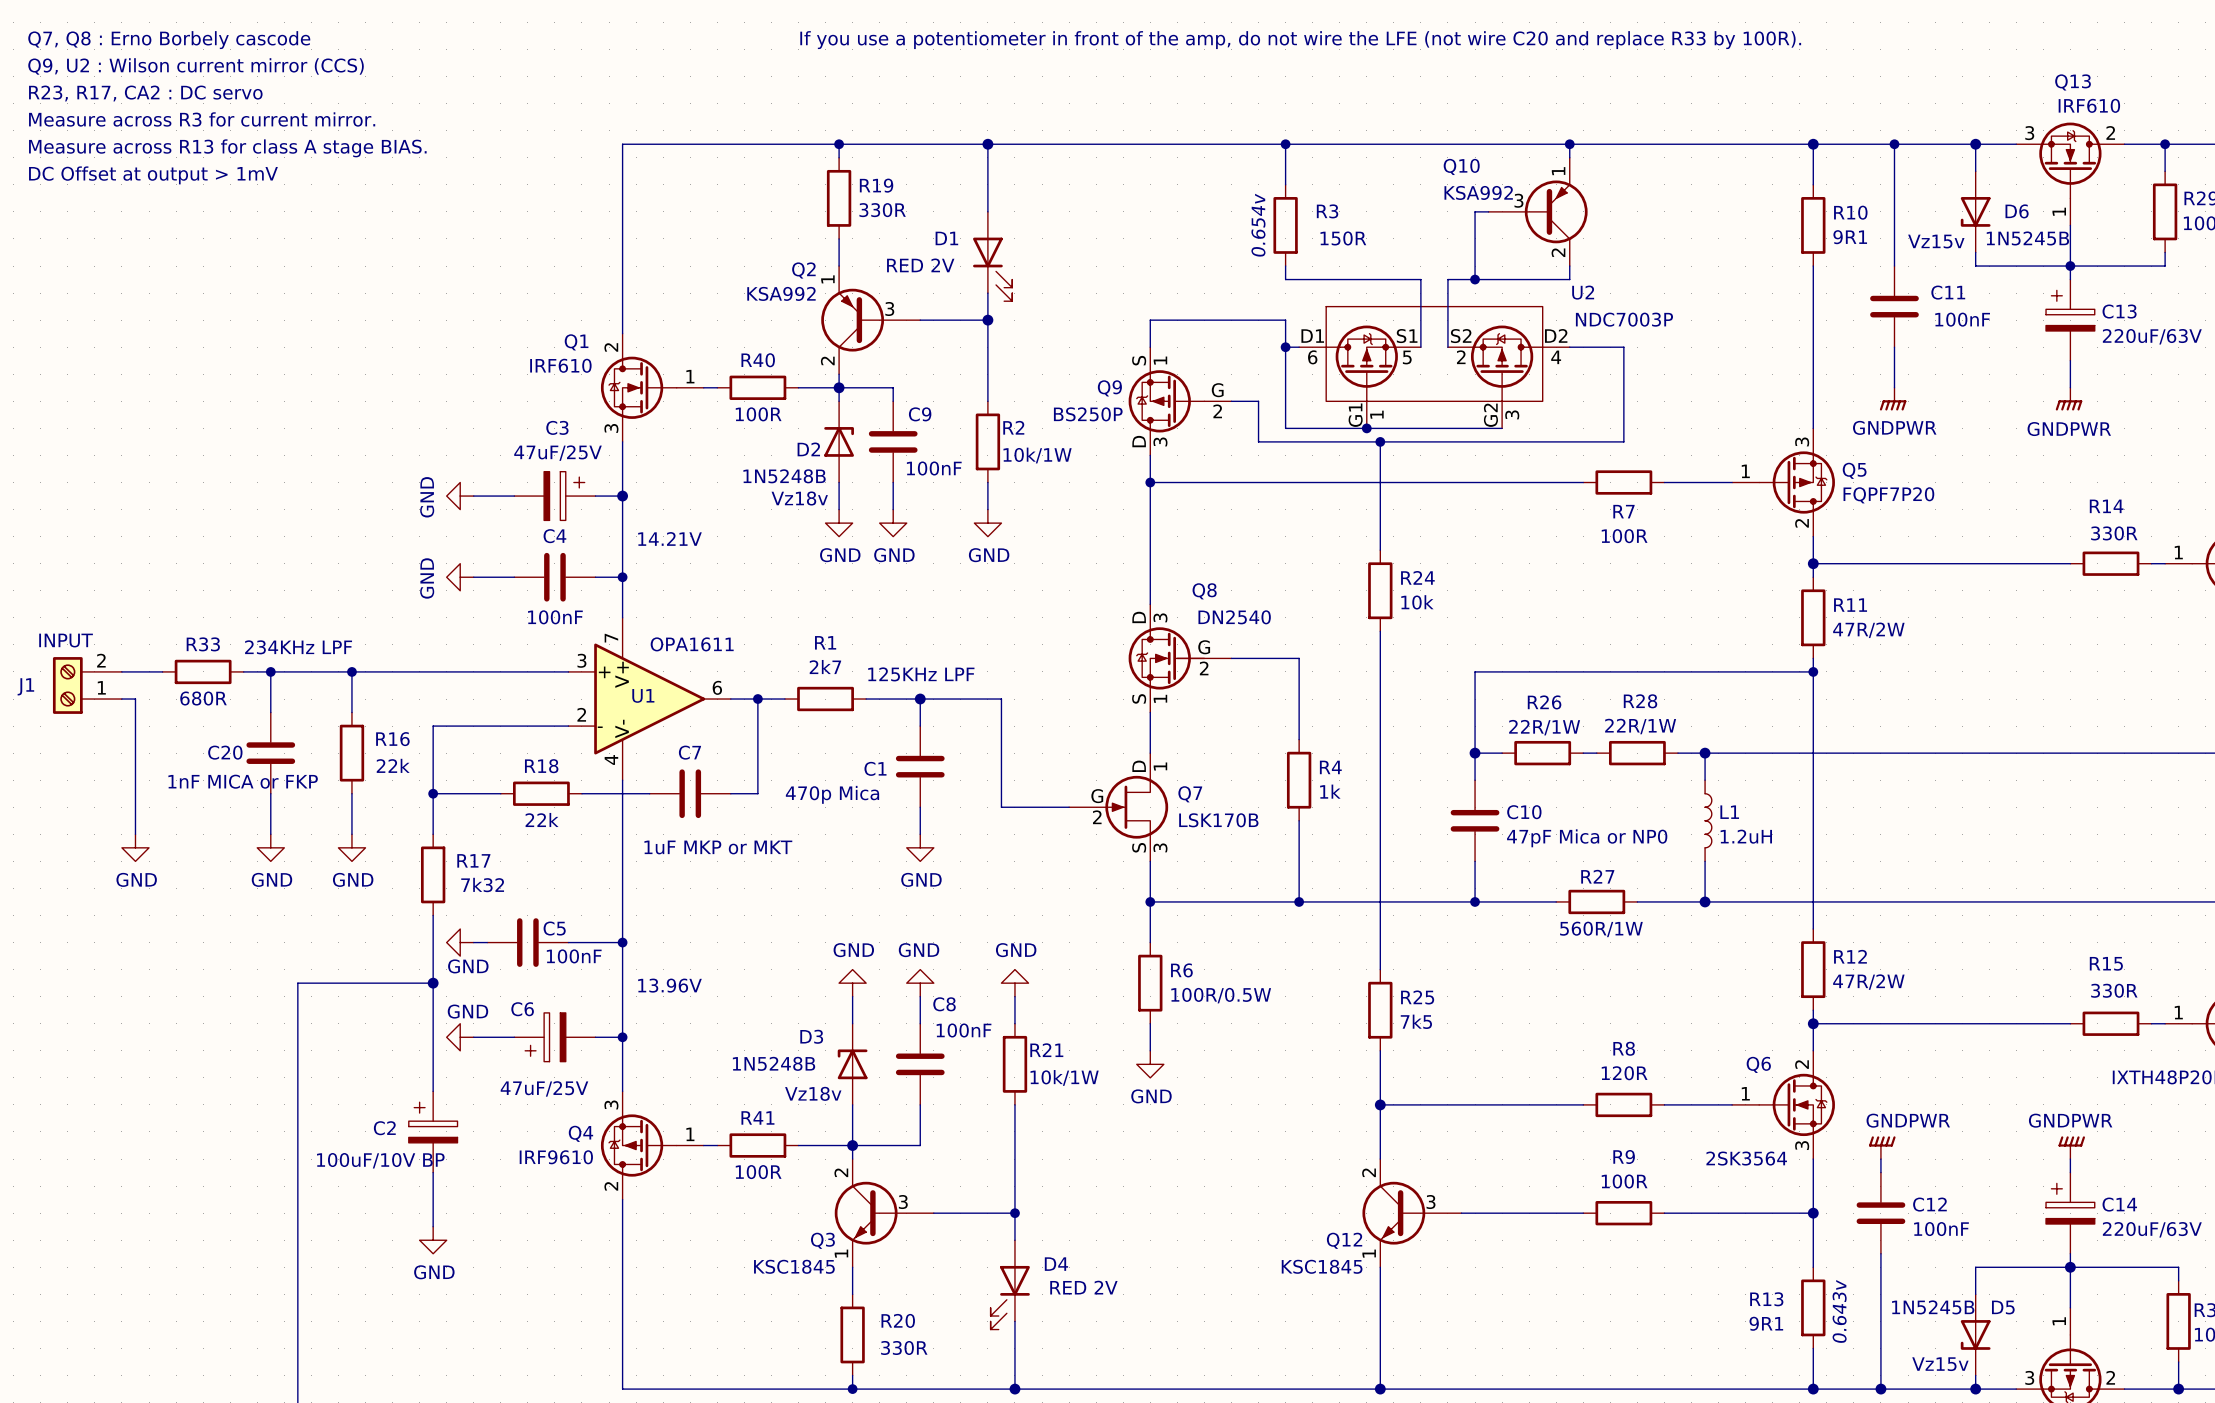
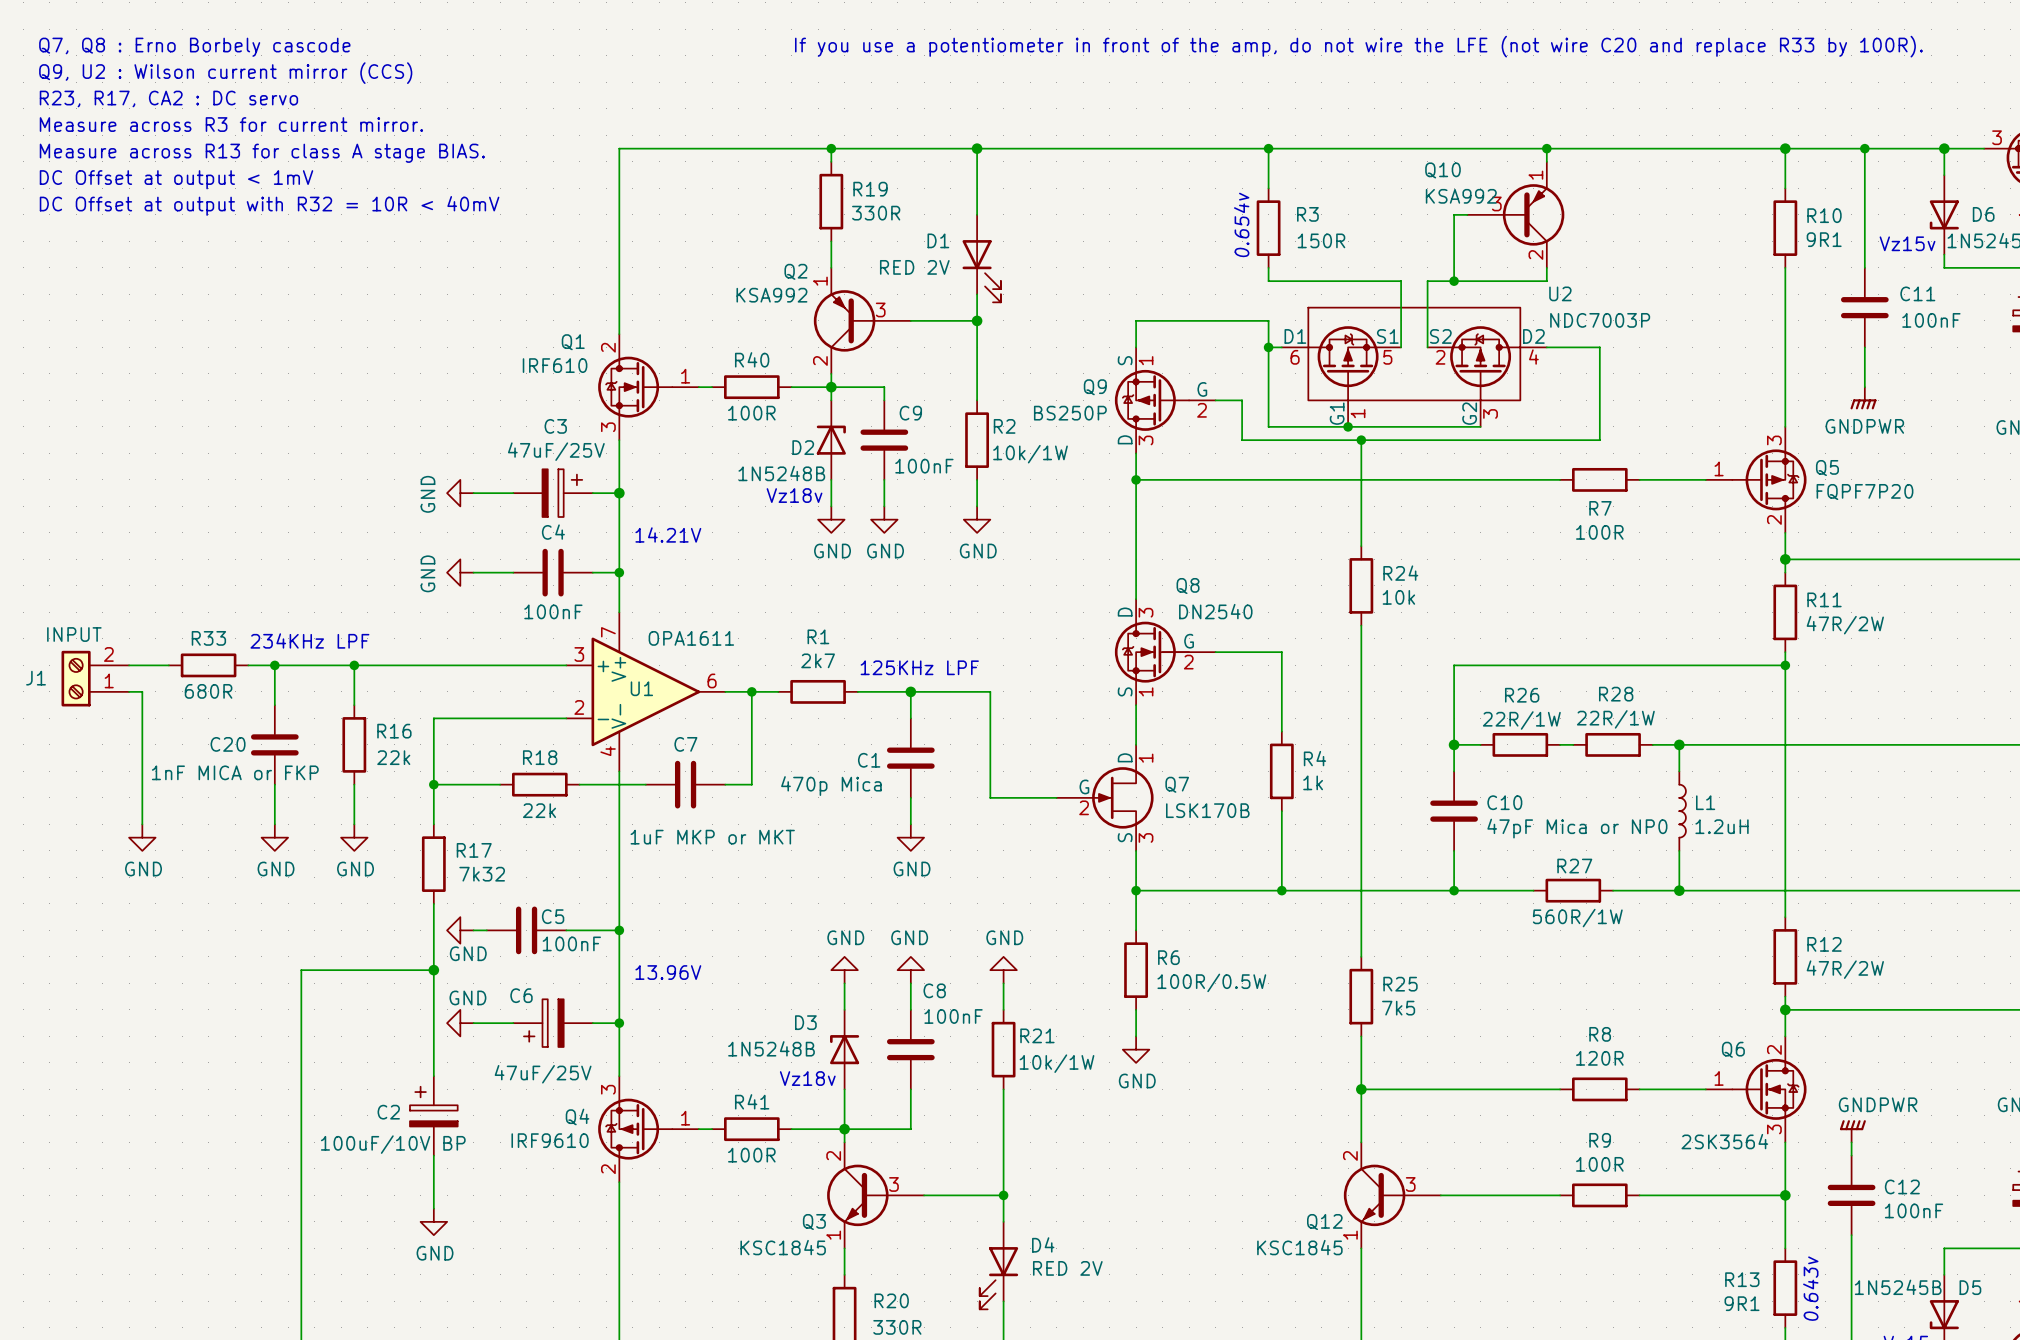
text: DC Offset at output > 1mV (153, 175) -> DC Offset at output < 1mV (176, 179)
text: none -> DC Offset at output with R32 = 10R < 40mV (269, 205)

